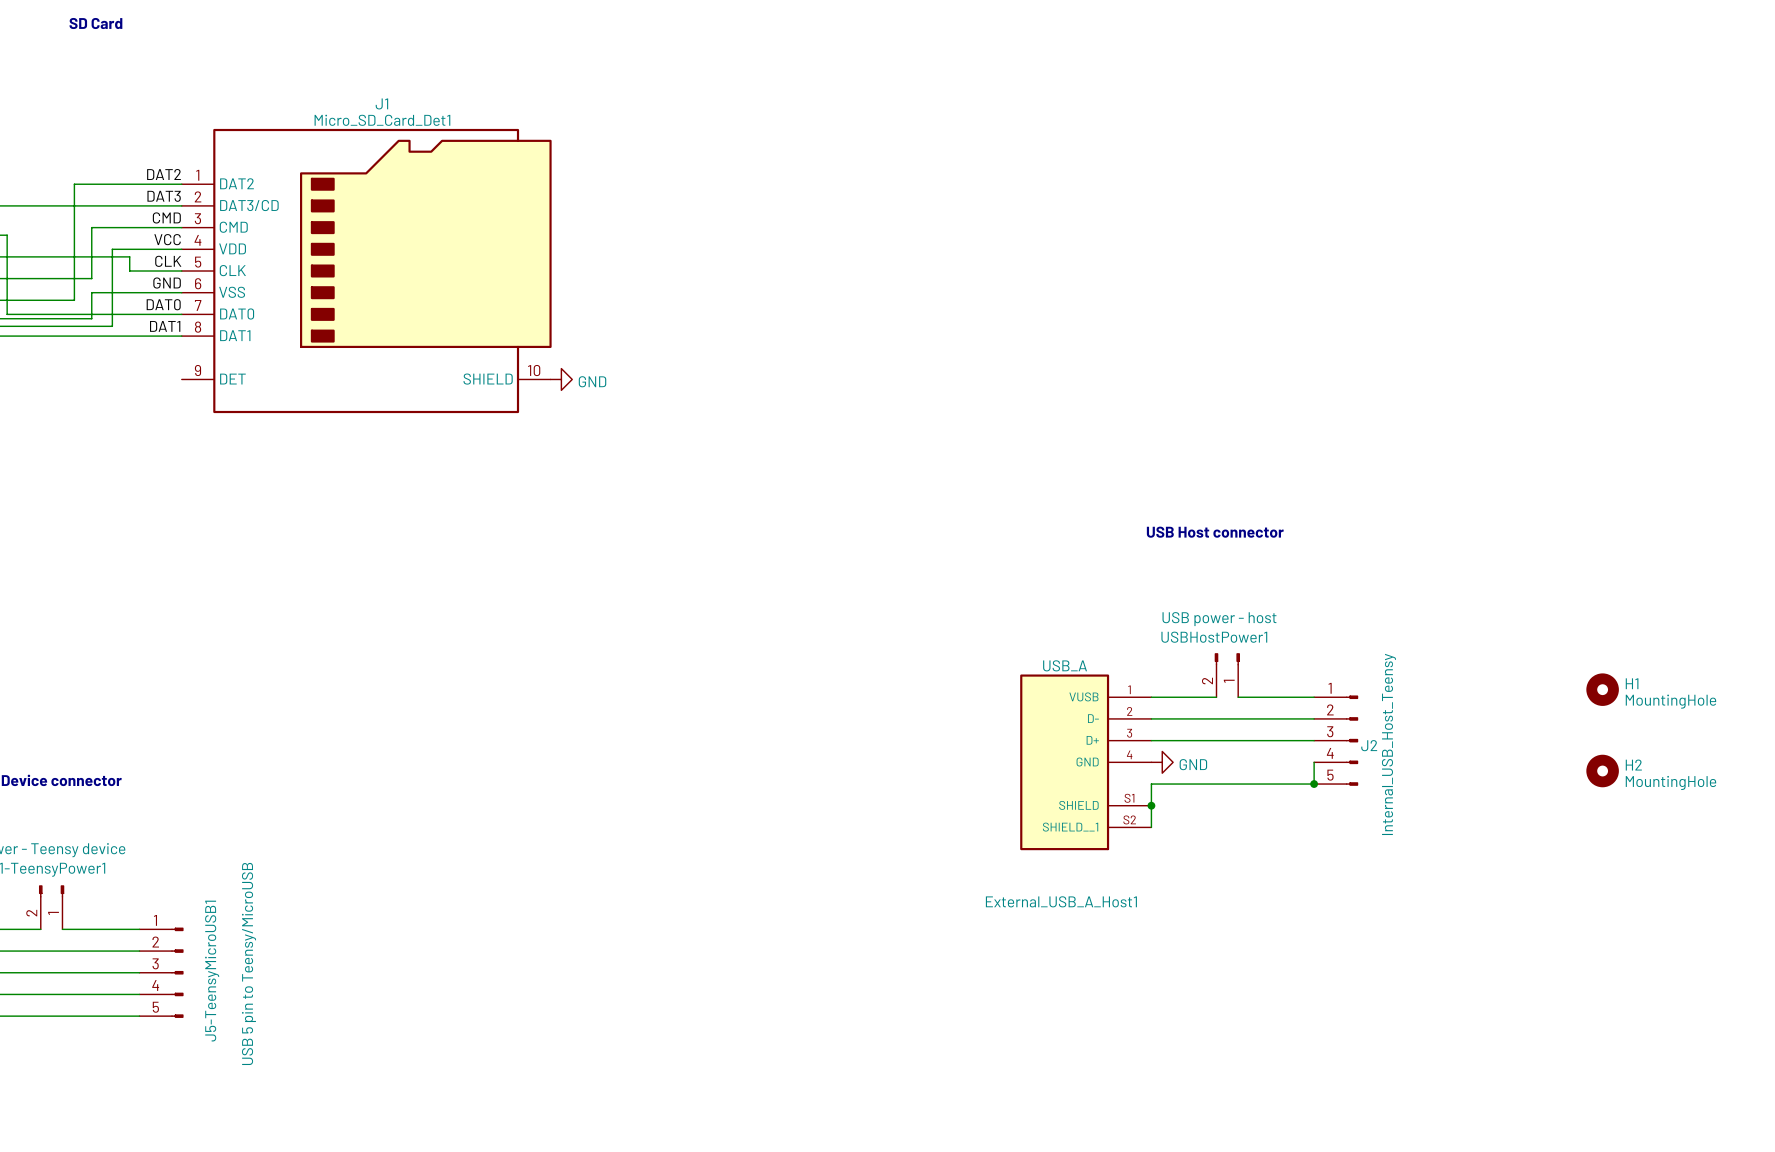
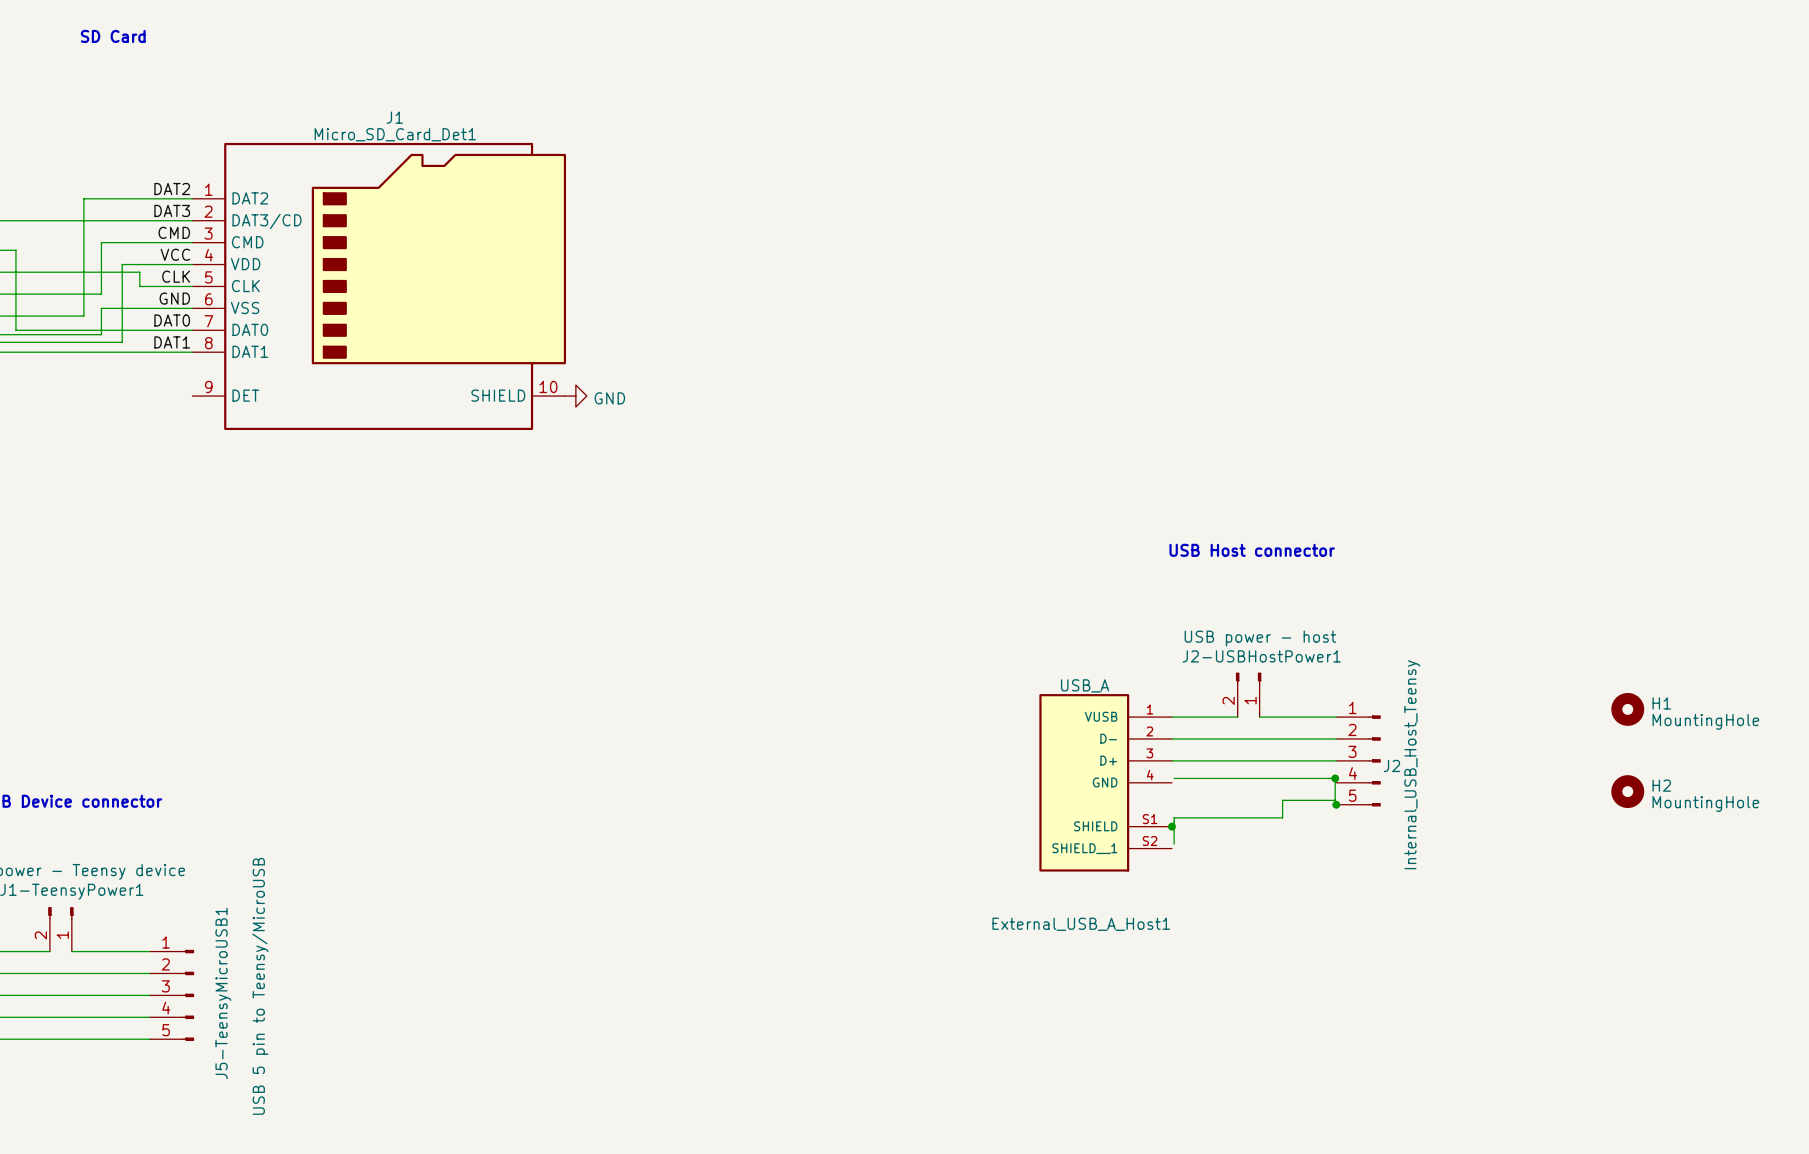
USBHostPower1 name: USBHostPower1 (1214, 637) -> J2-USBHostPower1 (1261, 656)
wire: none -> (1174, 778) (1335, 778) (1335, 800) (1282, 800) (1282, 817) (1174, 817) (1174, 844)
junction: none -> (1335, 778)
power symbol: GND (1162, 762) -> none
wire: (1314, 762) (1314, 784) (1151, 784) (1151, 827) -> none

